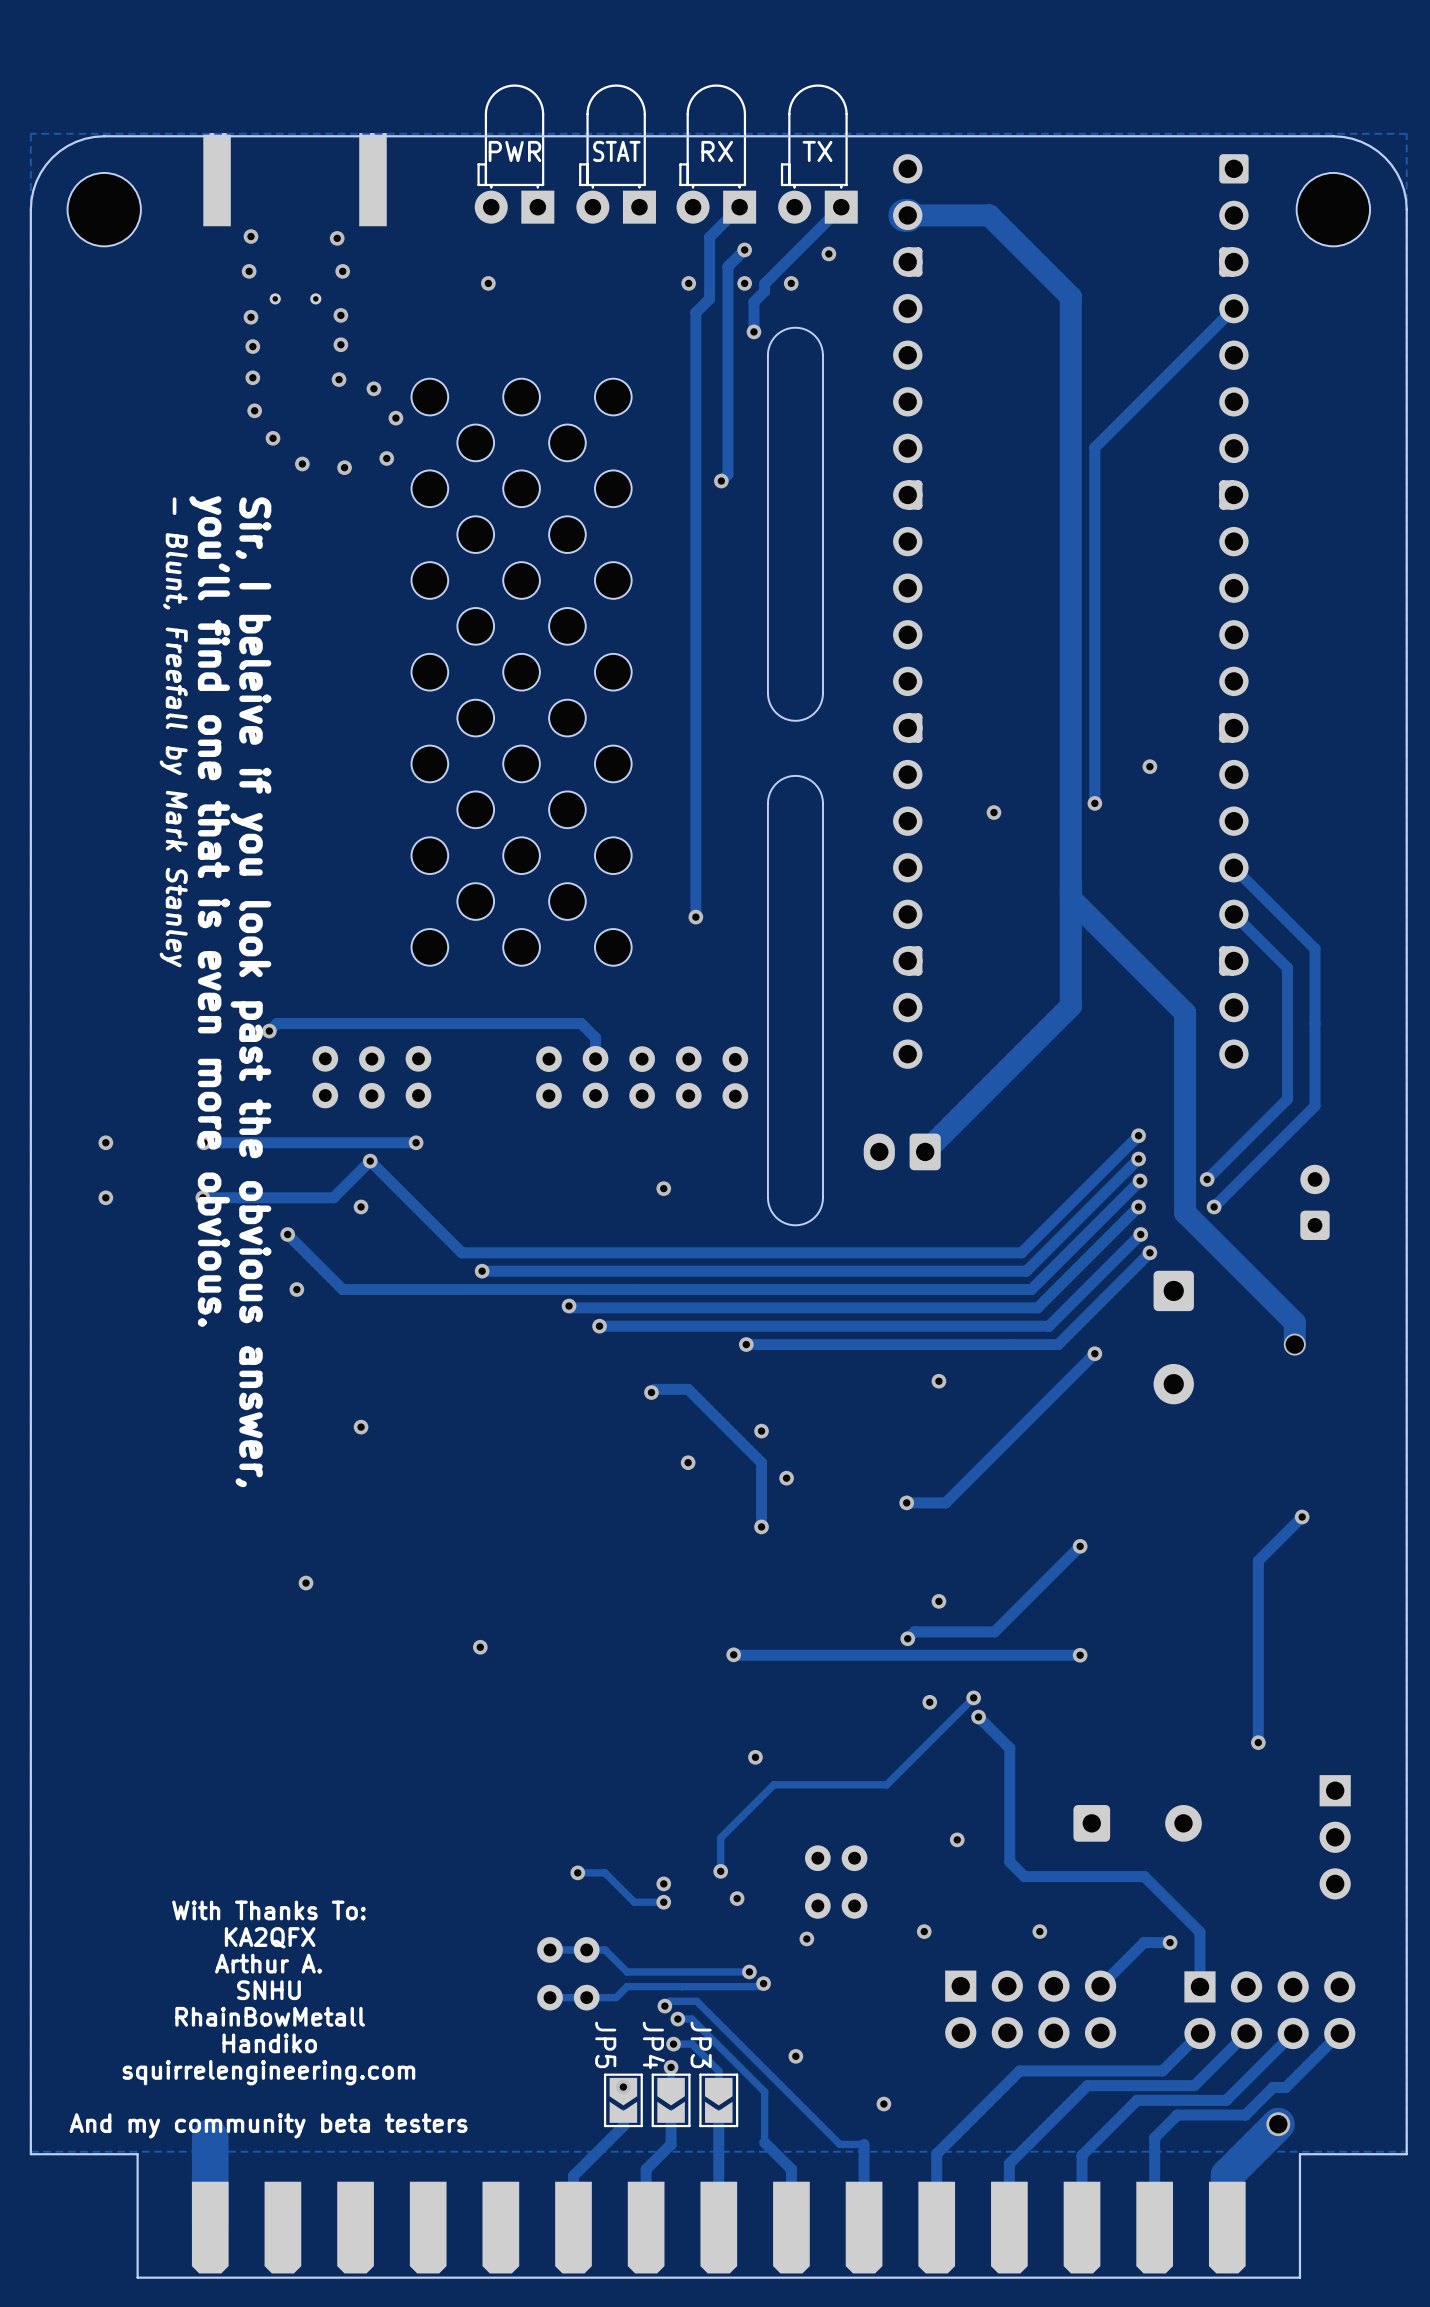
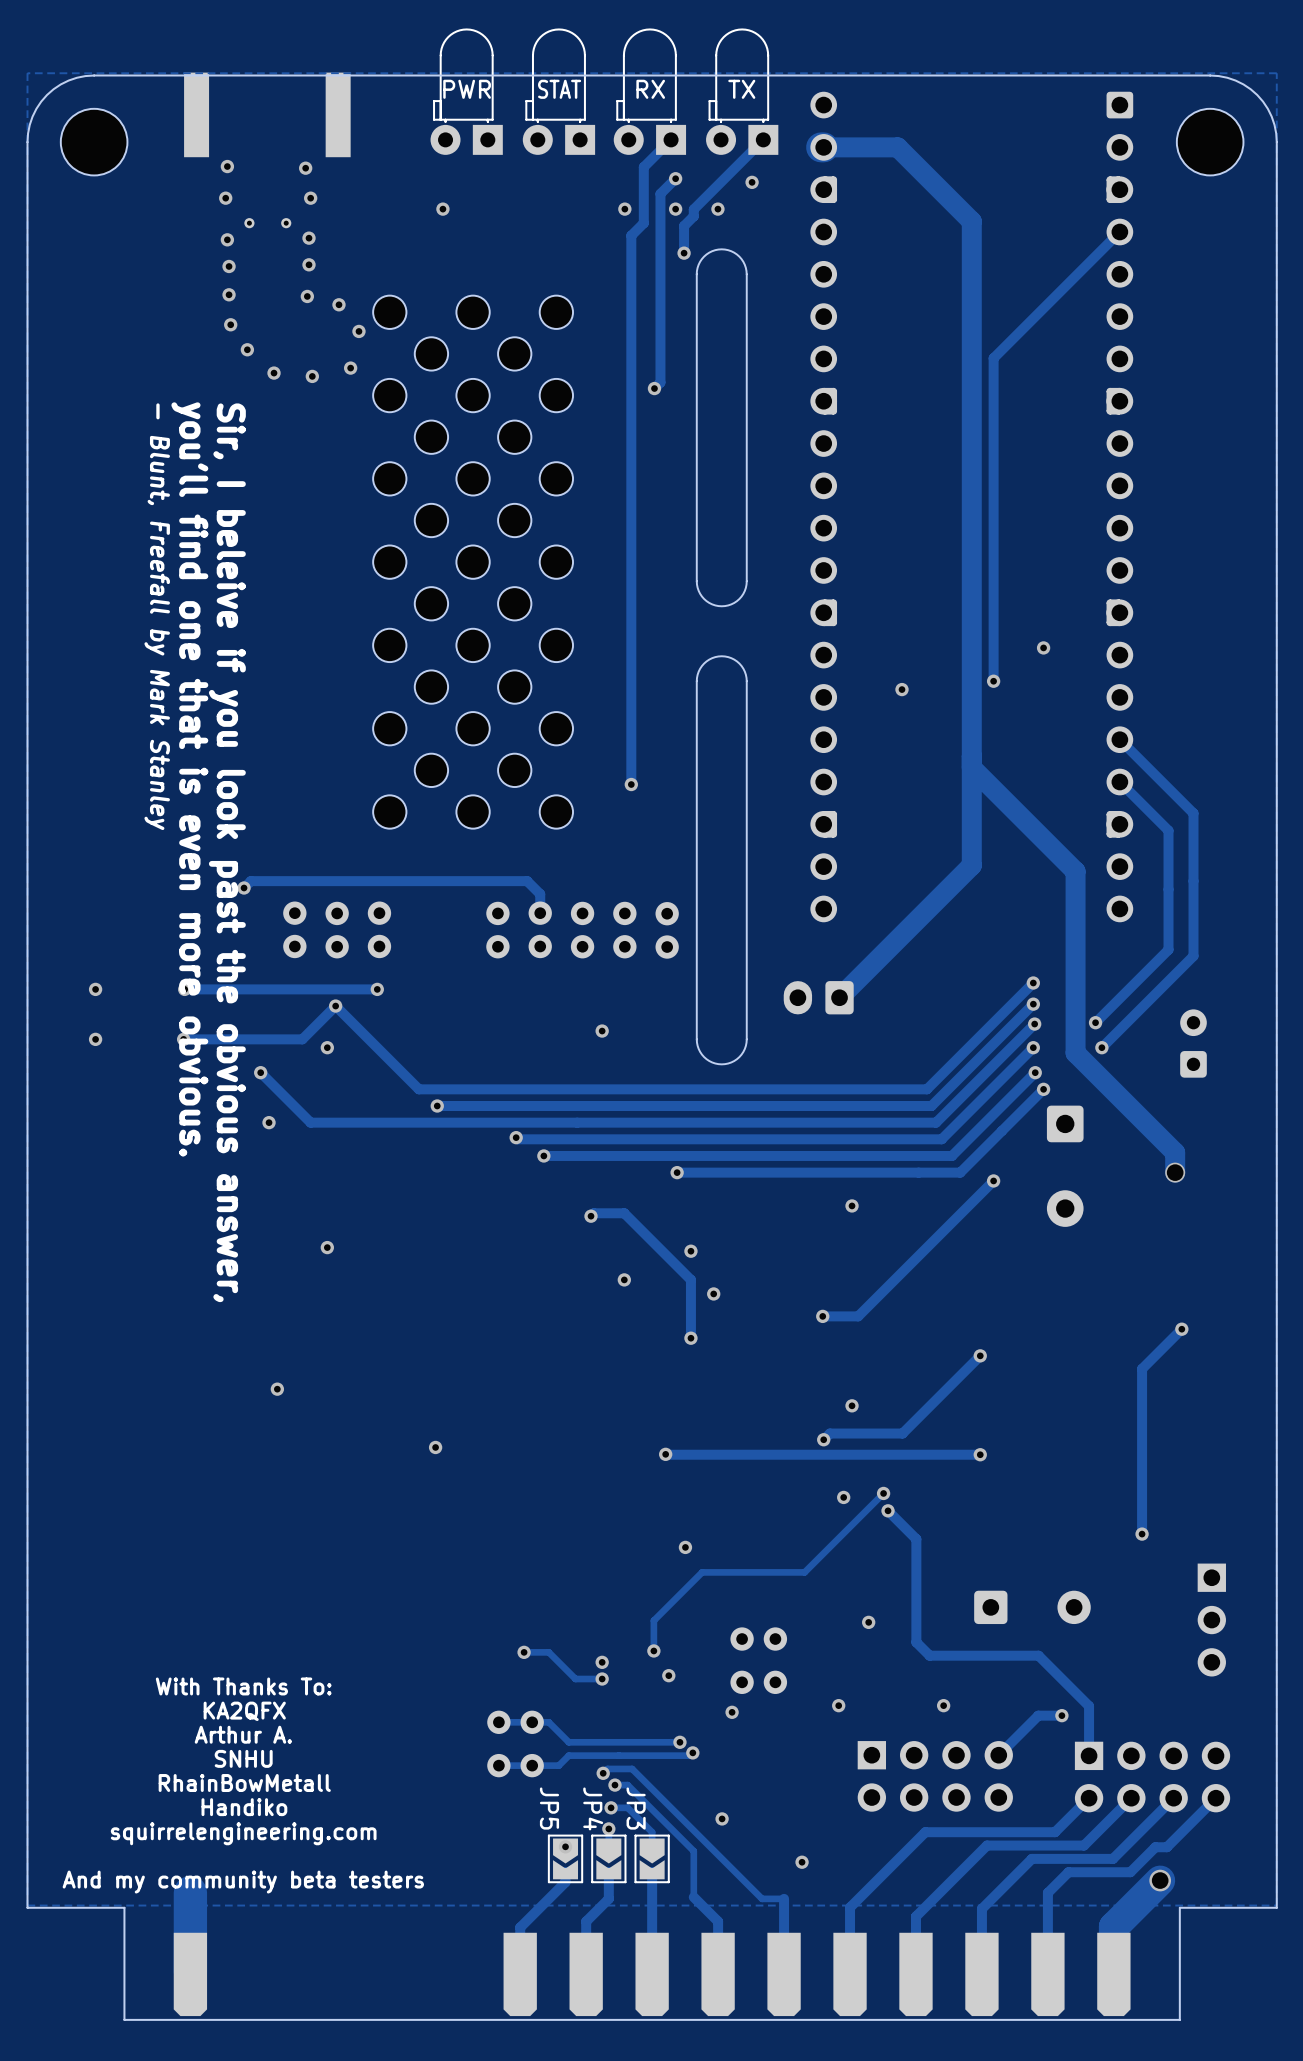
part footprint: [29, 135, 1408, 2279] -> [26, 74, 1278, 2021]

